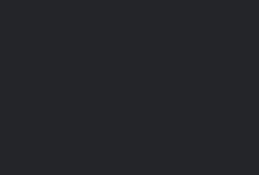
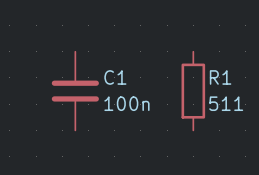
C1: none -> 100n (75, 91)
R1: none -> 511 (193, 91)

